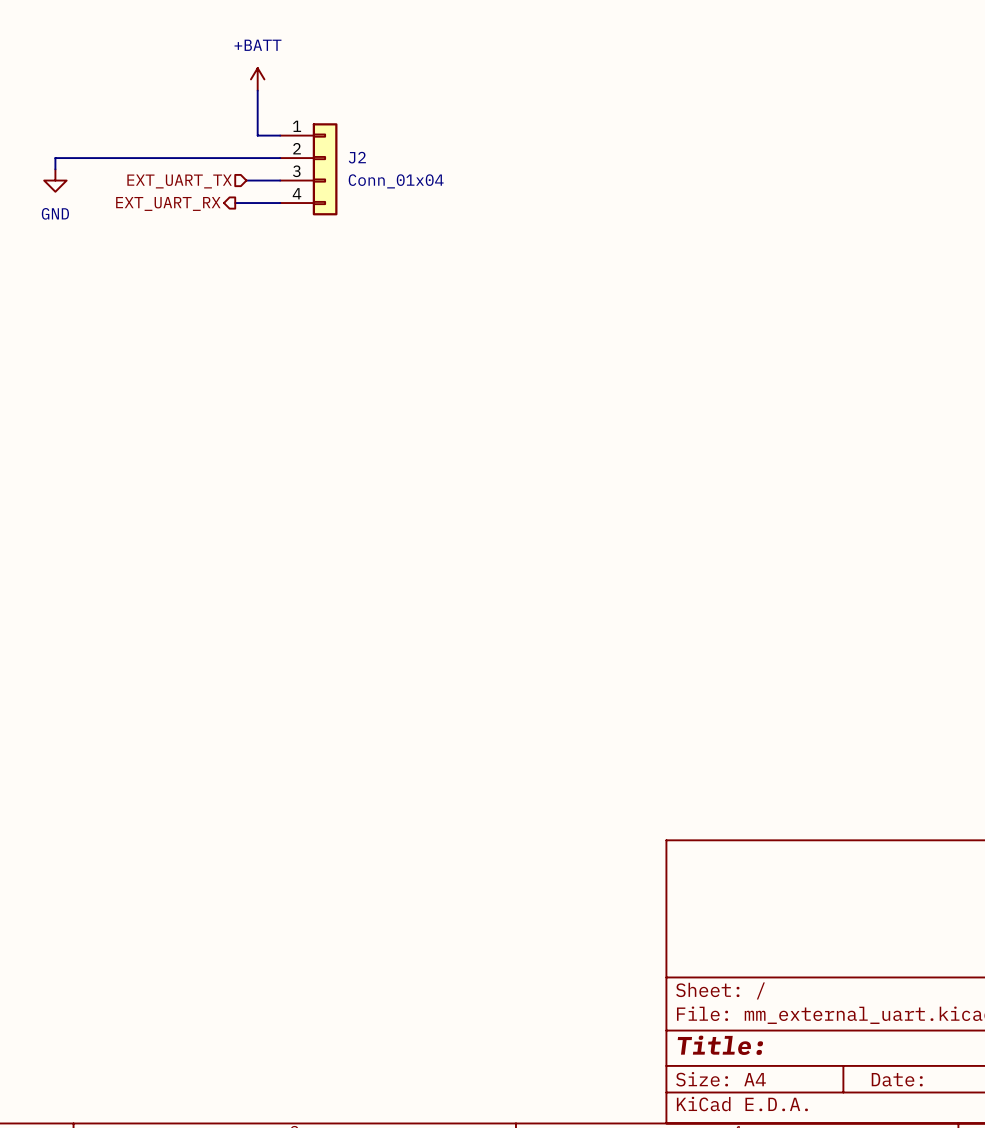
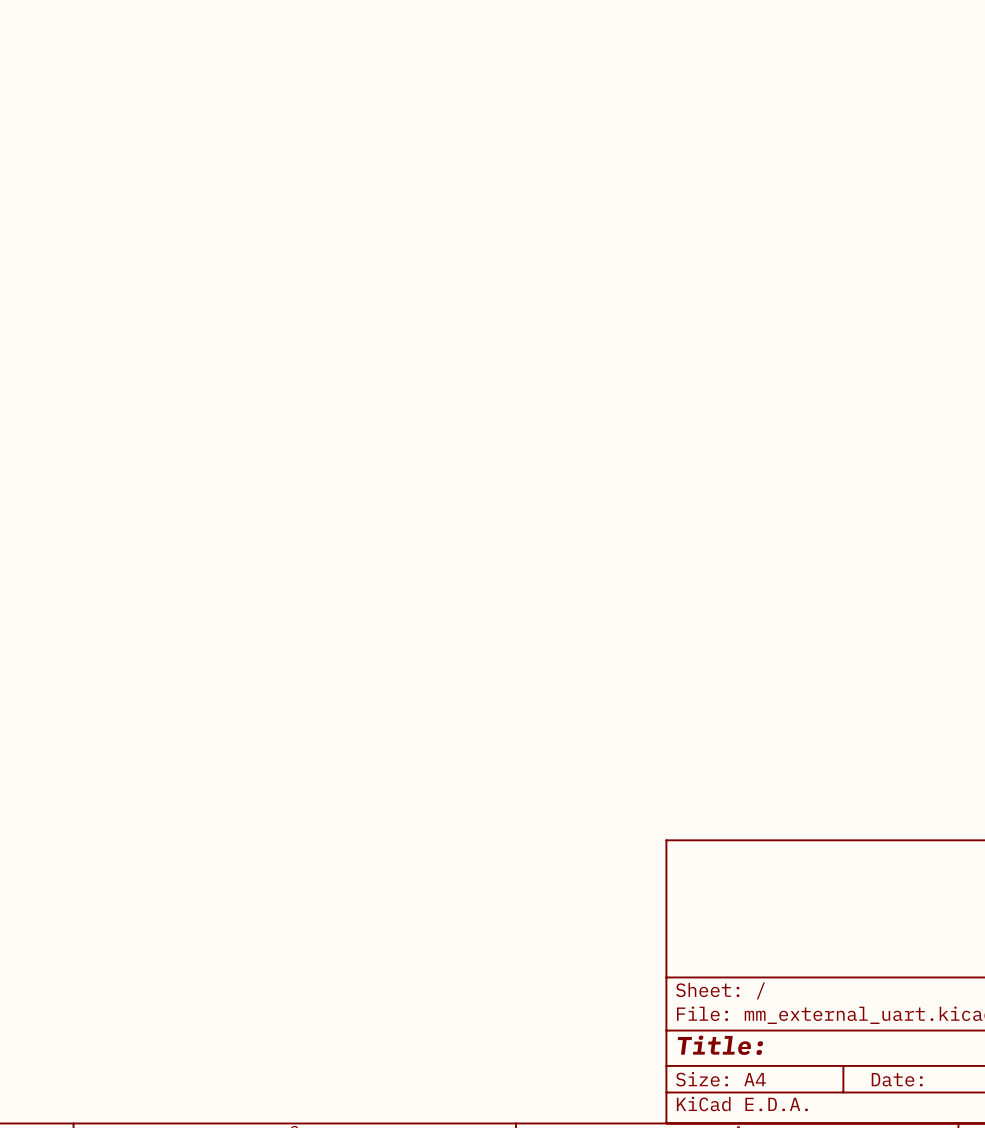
power symbol: +BATT (257, 79) -> none
wire: (257, 90) (257, 135) (280, 135) -> none
wire: (280, 158) (55, 158) (55, 169) -> none
J2: Conn_01x04 (308, 169) -> none
power symbol: GND (55, 180) -> none
wire: (246, 180) (280, 180) -> none
hierarchical label: EXT_UART_TX (179, 181) -> none
hierarchical label: EXT_UART_RX (168, 203) -> none
wire: (235, 203) (280, 203) -> none

